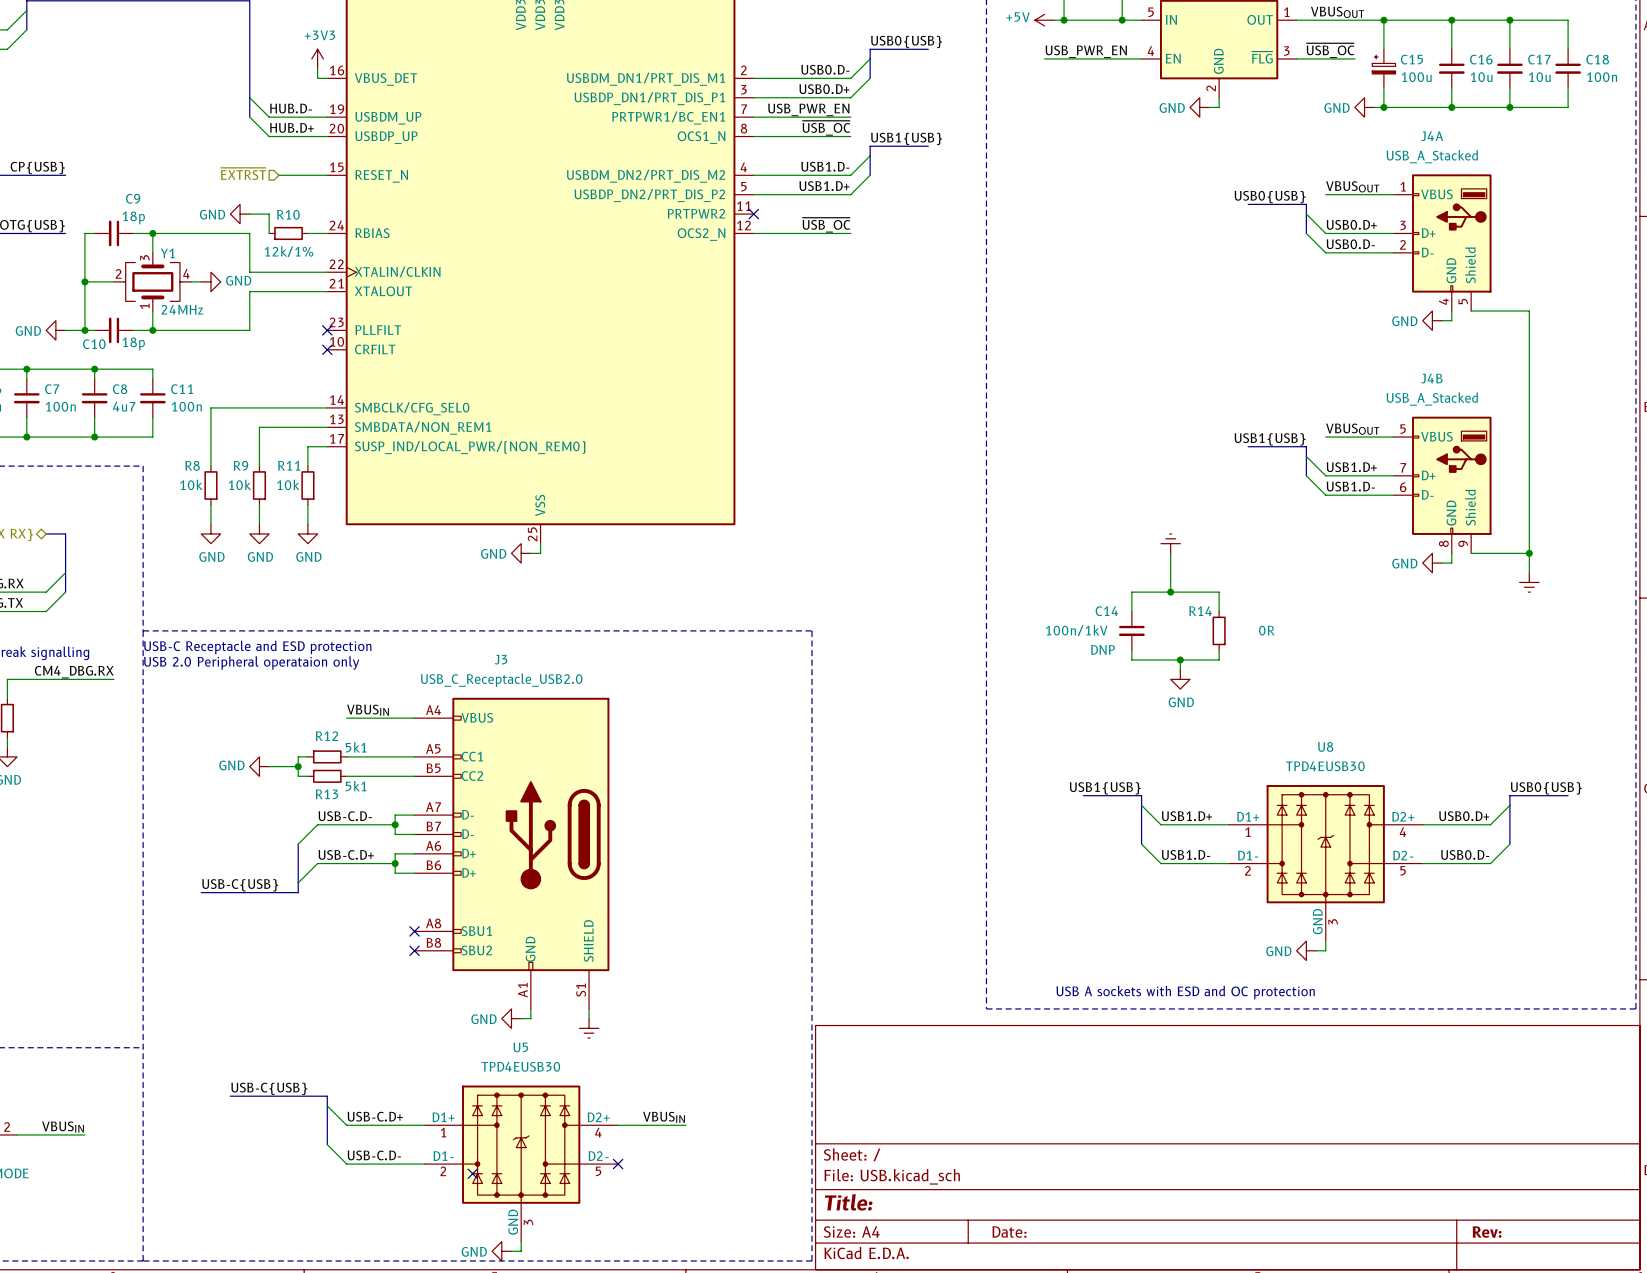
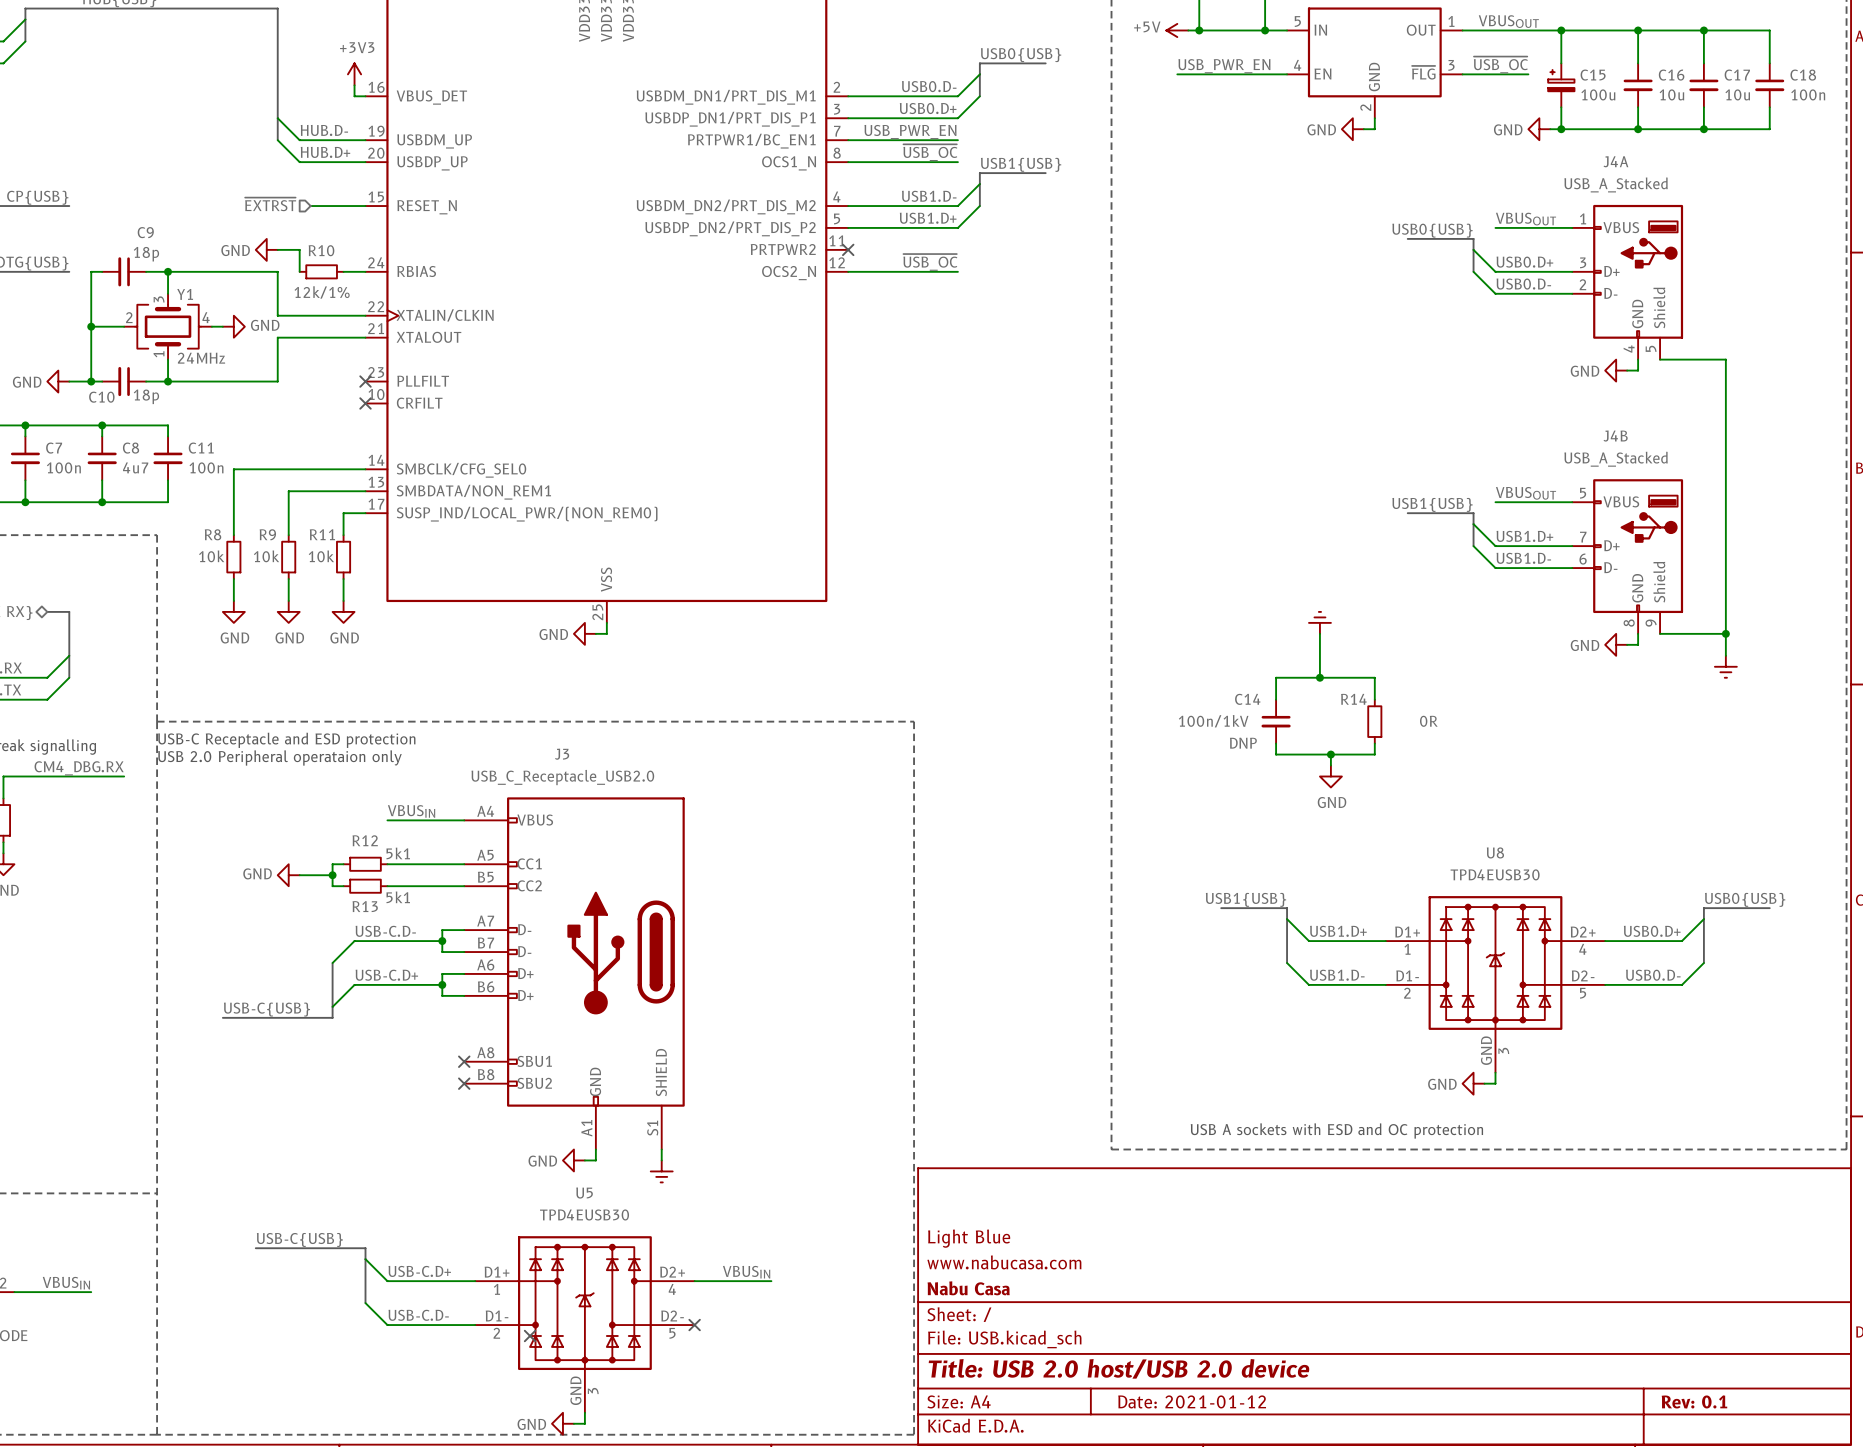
title block: none -> Light Blue (969, 1238)
title block: none -> www.nabucasa.com (1004, 1262)
title block: none -> Nabu Casa (968, 1288)
title block: Title: (848, 1202) -> Title: USB 2.0 host/USB 2.0 device (1119, 1368)
title block: Date: (1009, 1232) -> Date: 2021-01-12 (1192, 1401)
title block: Rev: (1487, 1232) -> Rev: 0.1 (1694, 1401)

